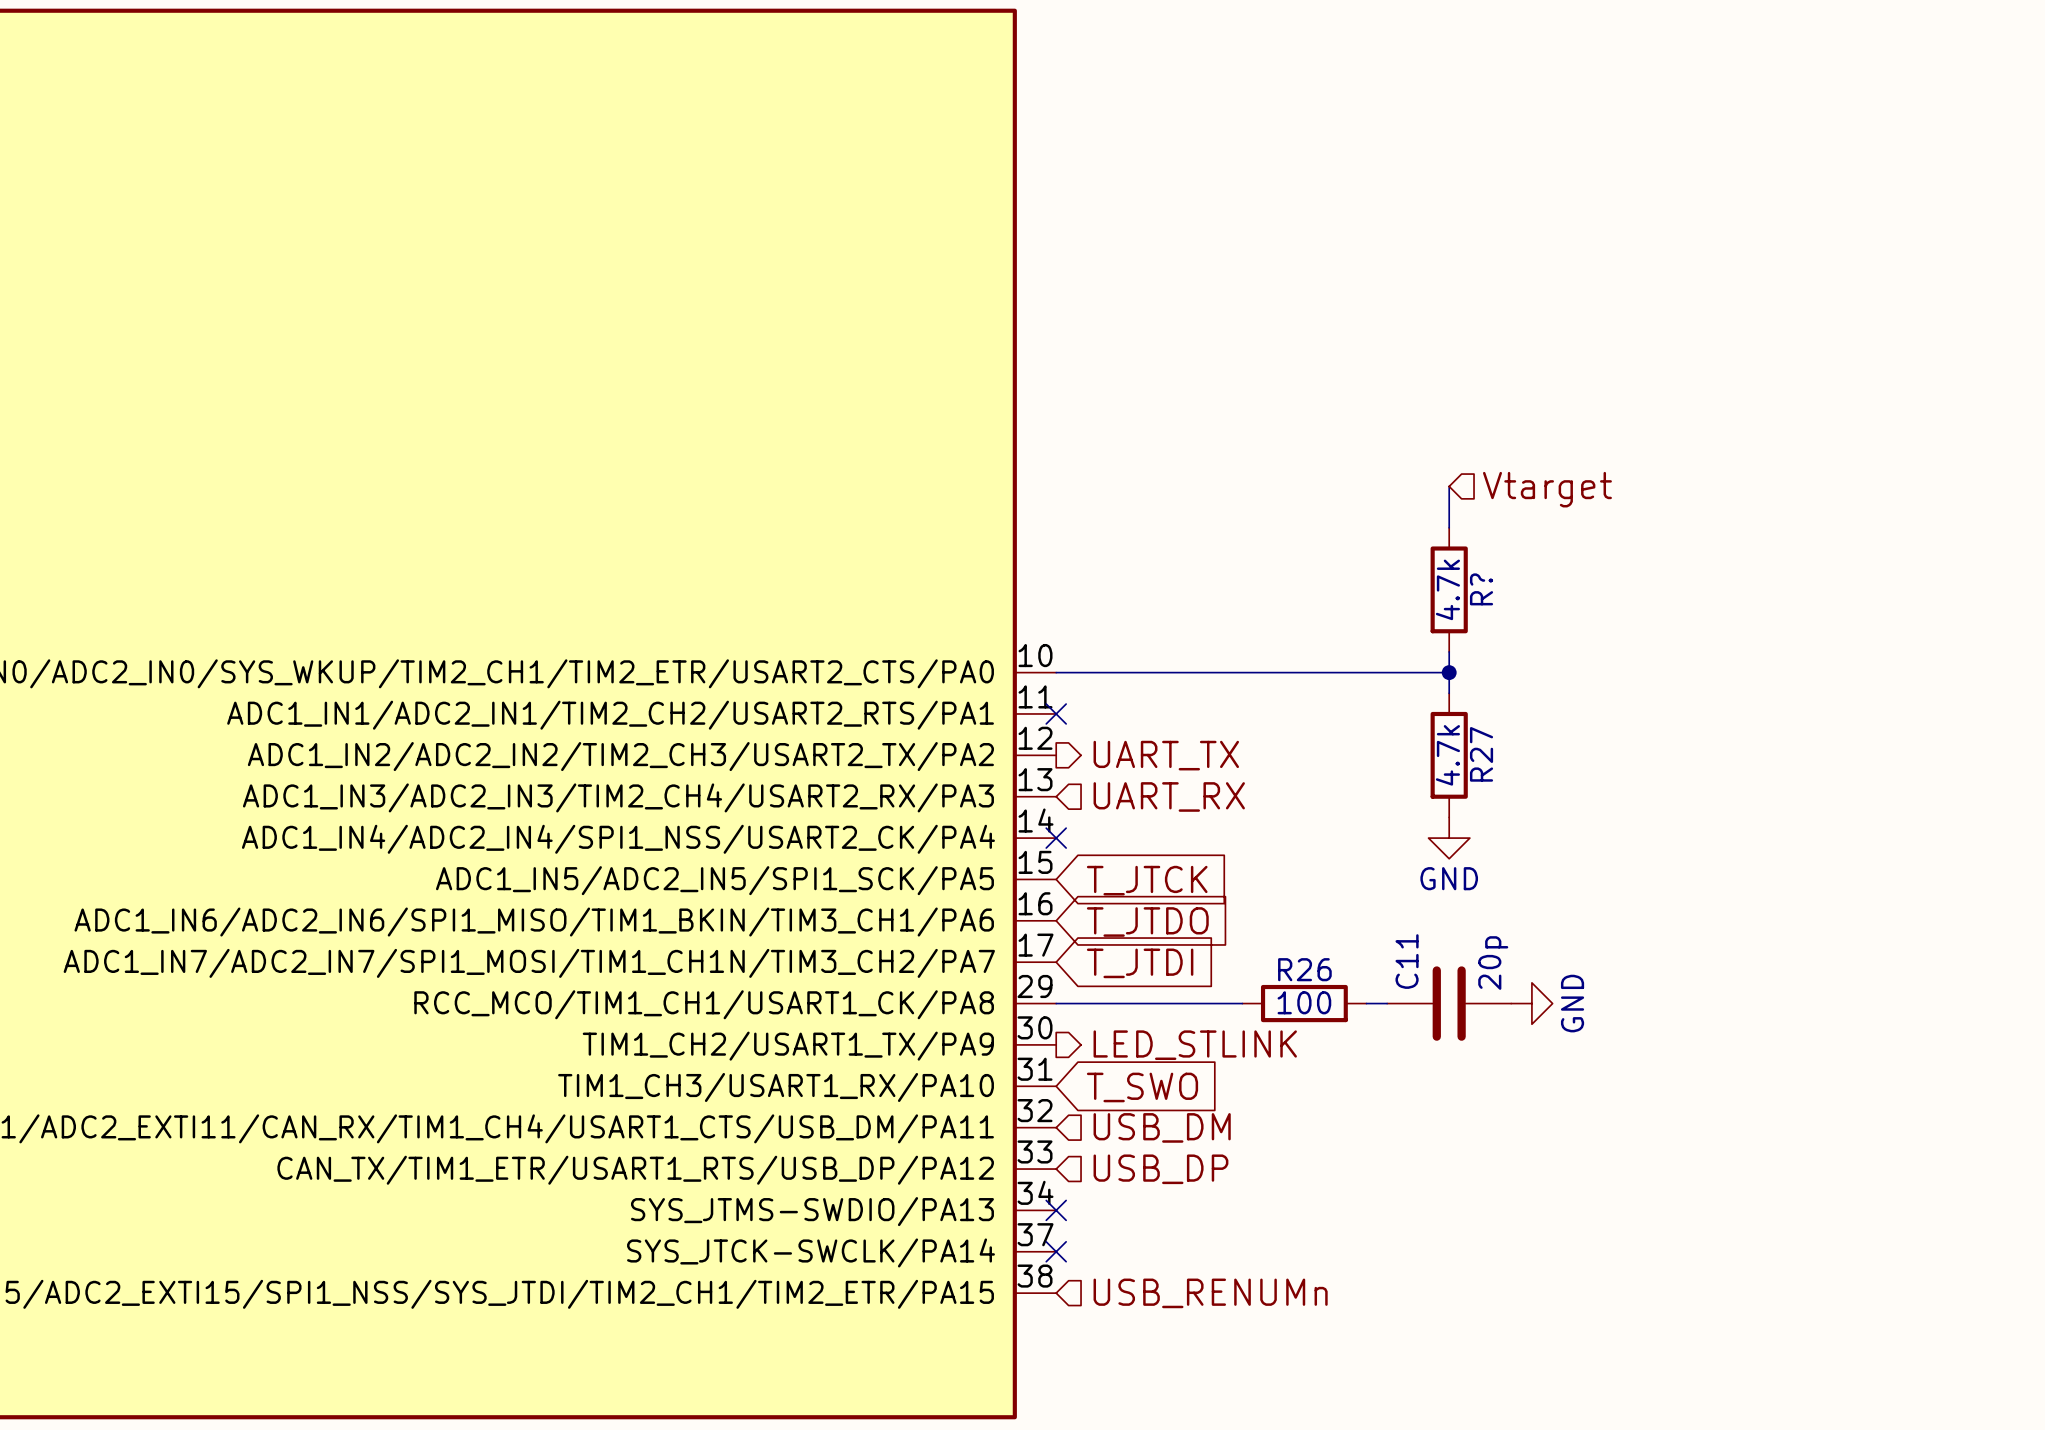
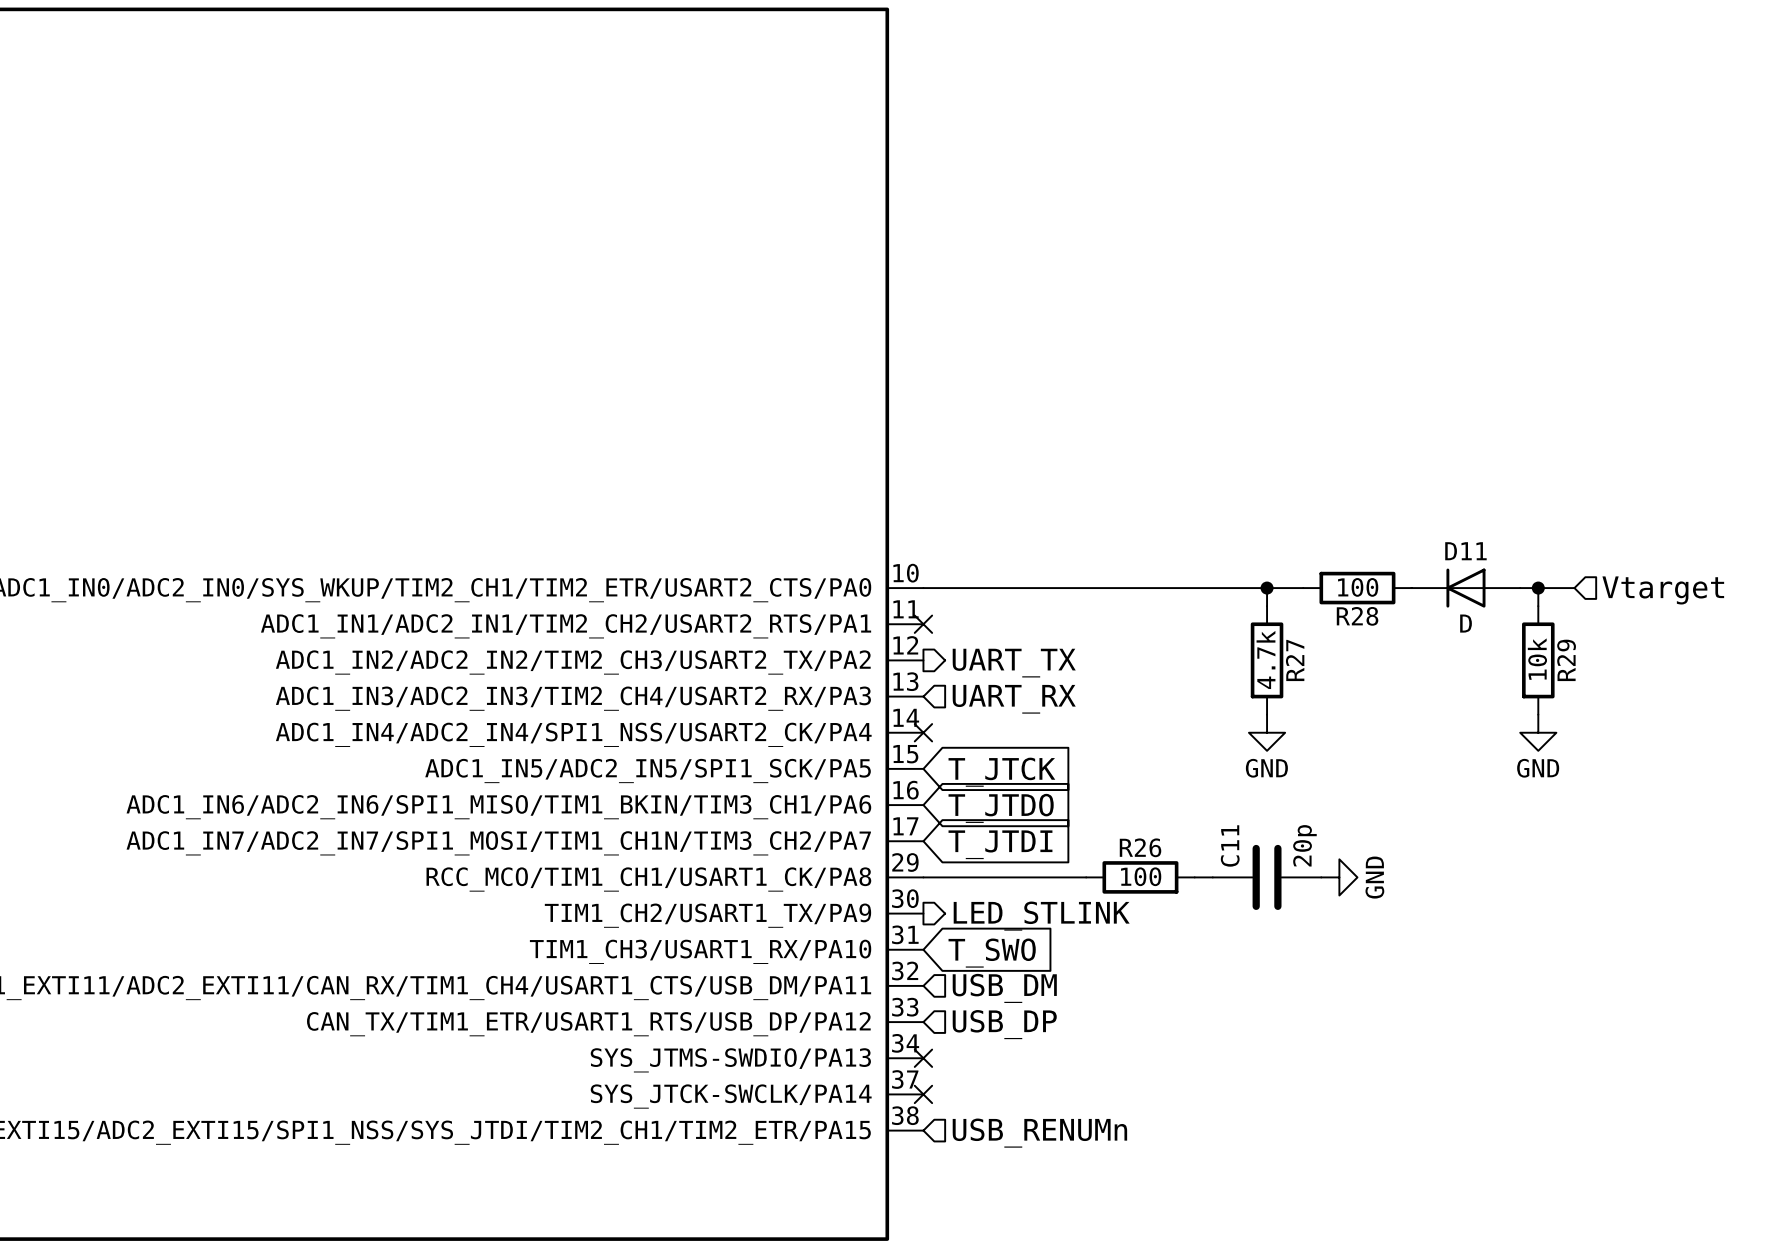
wire: (1449, 486) (1449, 527) -> none
hierarchical label position: Vtarget (1547, 489) -> Vtarget (1663, 590)
R?: 4.7k (1449, 589) -> none
wire: (1449, 651) (1449, 672) -> (1303, 588) (1267, 588)
R28: none -> 100 (1357, 588)
D11: none -> D (1465, 588)
wire: none -> (1520, 588) (1574, 588)
wire: none -> (1538, 588) (1538, 606)
junction: none -> (1538, 588)
R29: none -> 10k (1538, 660)
power symbol: none -> GND (1538, 732)

